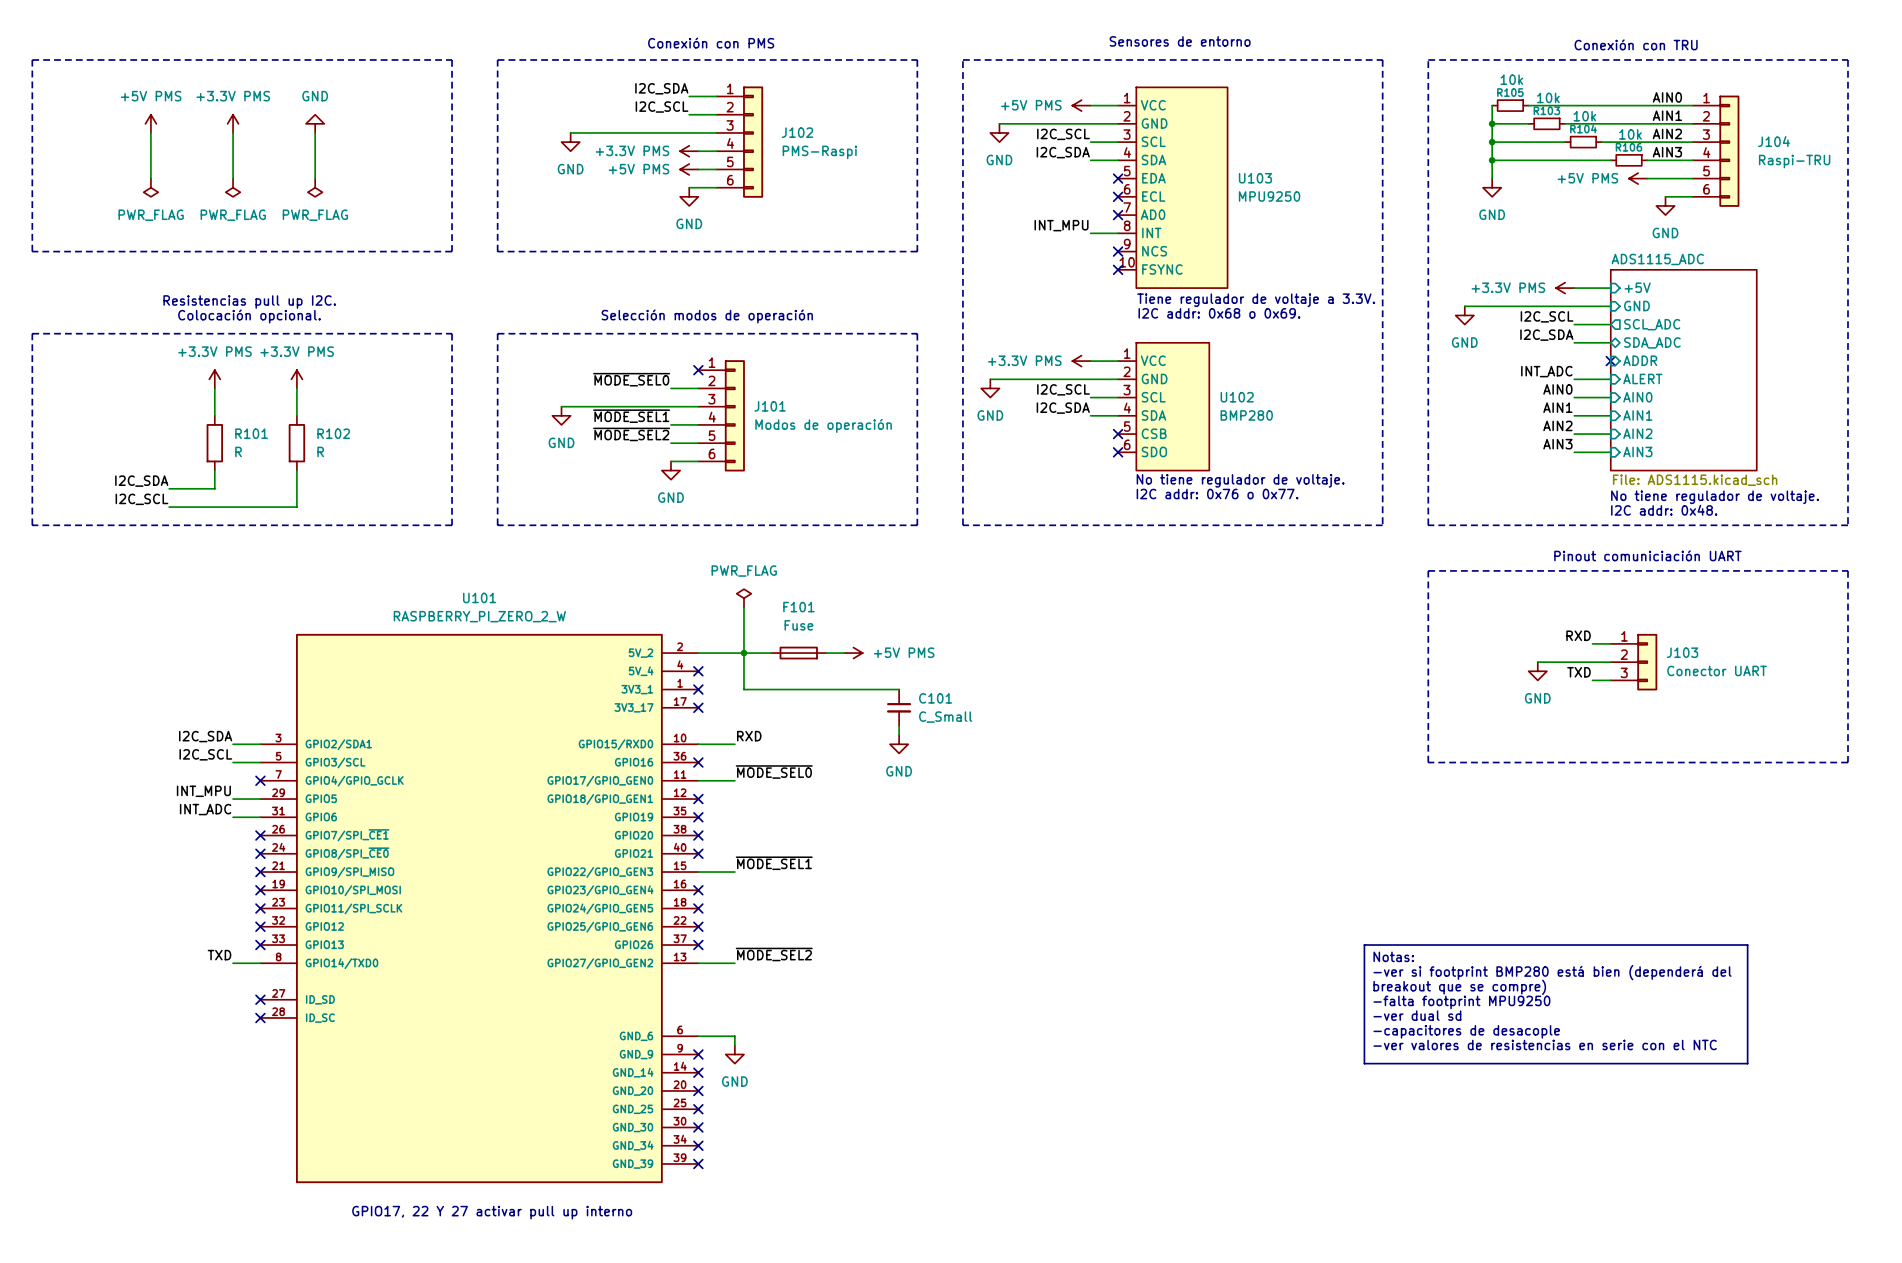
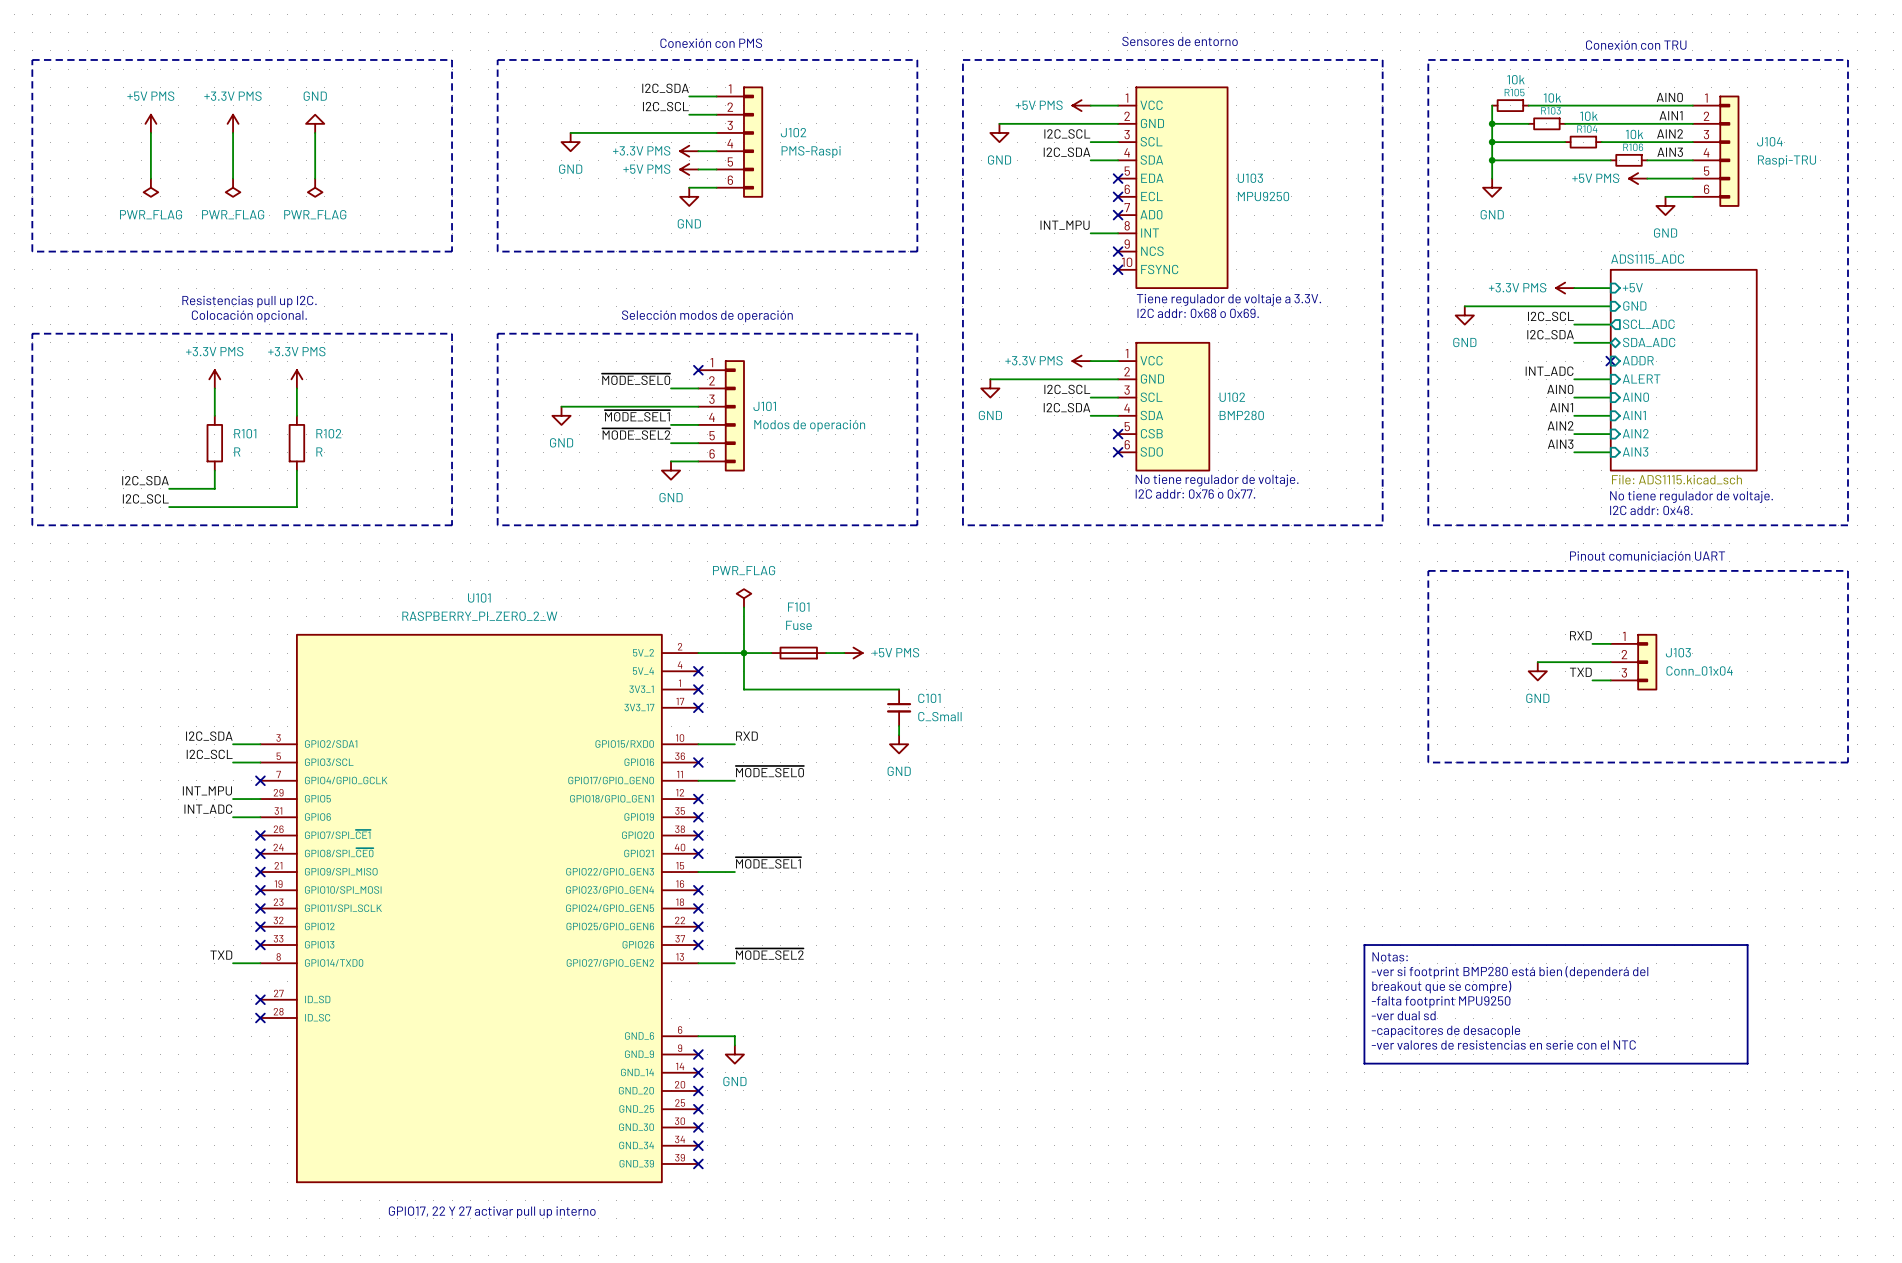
J103 value: Conector UART (1717, 670) -> Conn_01x04 (1699, 670)

